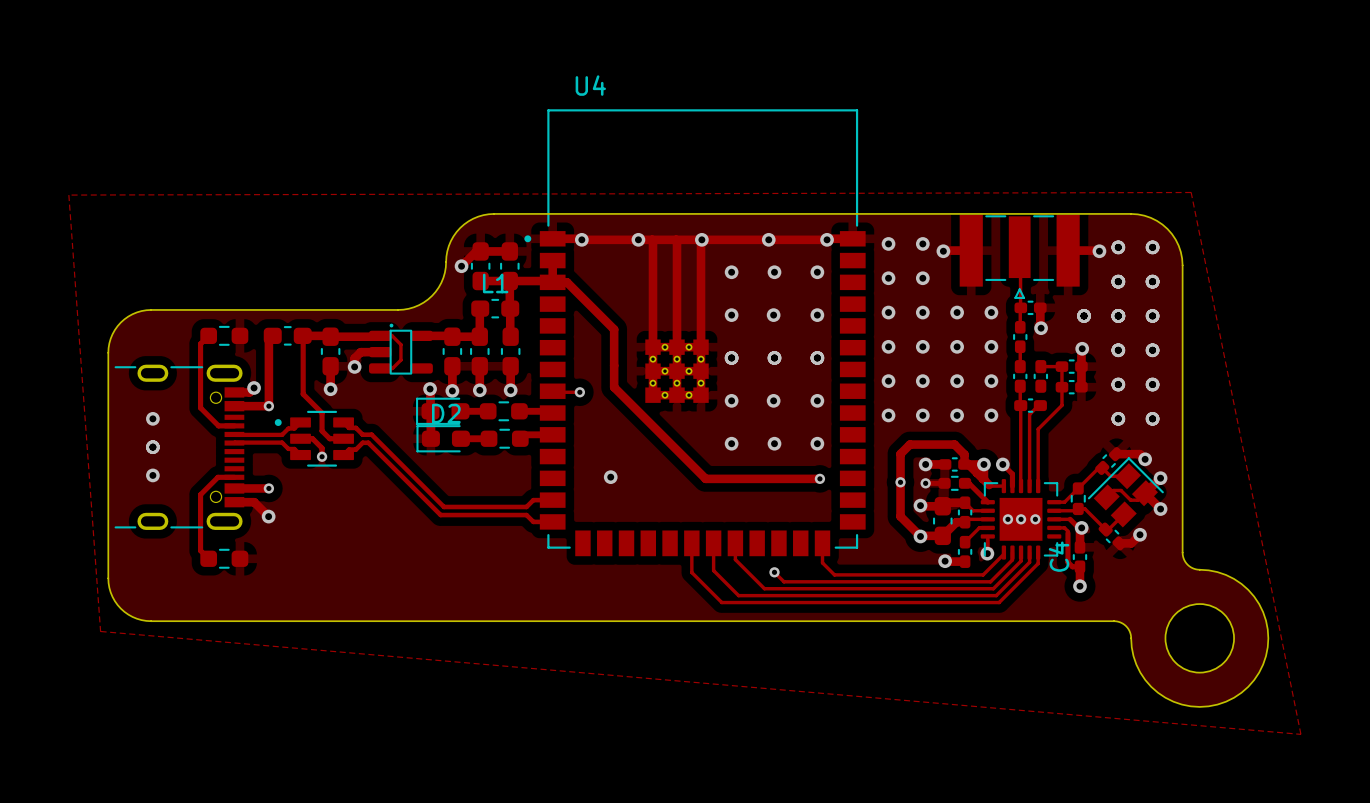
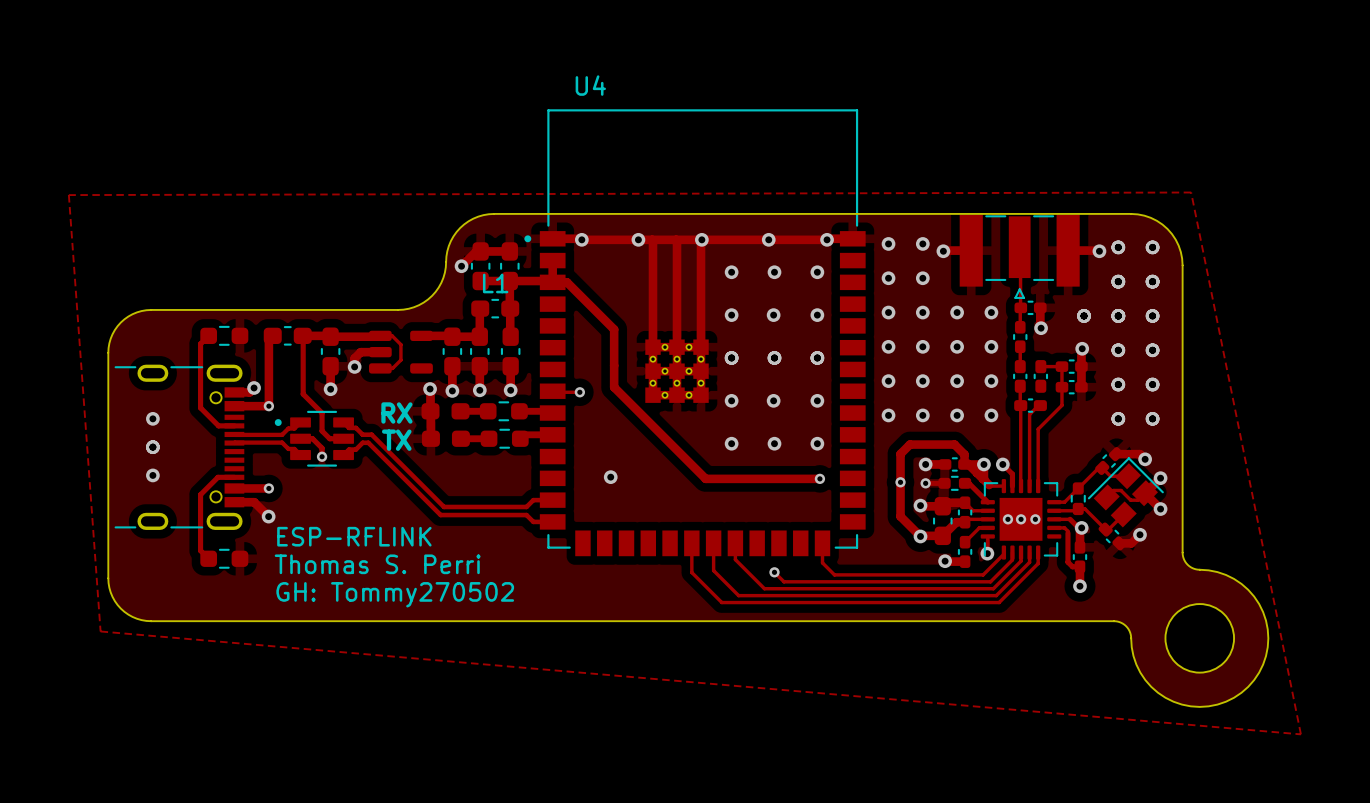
part footprint: [368, 323, 433, 375] -> [368, 330, 433, 374]
part footprint: [416, 397, 470, 425] -> [421, 403, 470, 420]
text: none -> RX (396, 413)
D2: (443, 438) -> none
text: none -> TX (396, 440)
text: none -> ESP-RFLINK (354, 536)
C4 name: C4 (1059, 556) -> none
text: none -> Thomas S. Perri (377, 564)
text: none -> GH: Tommy270502 (395, 594)

